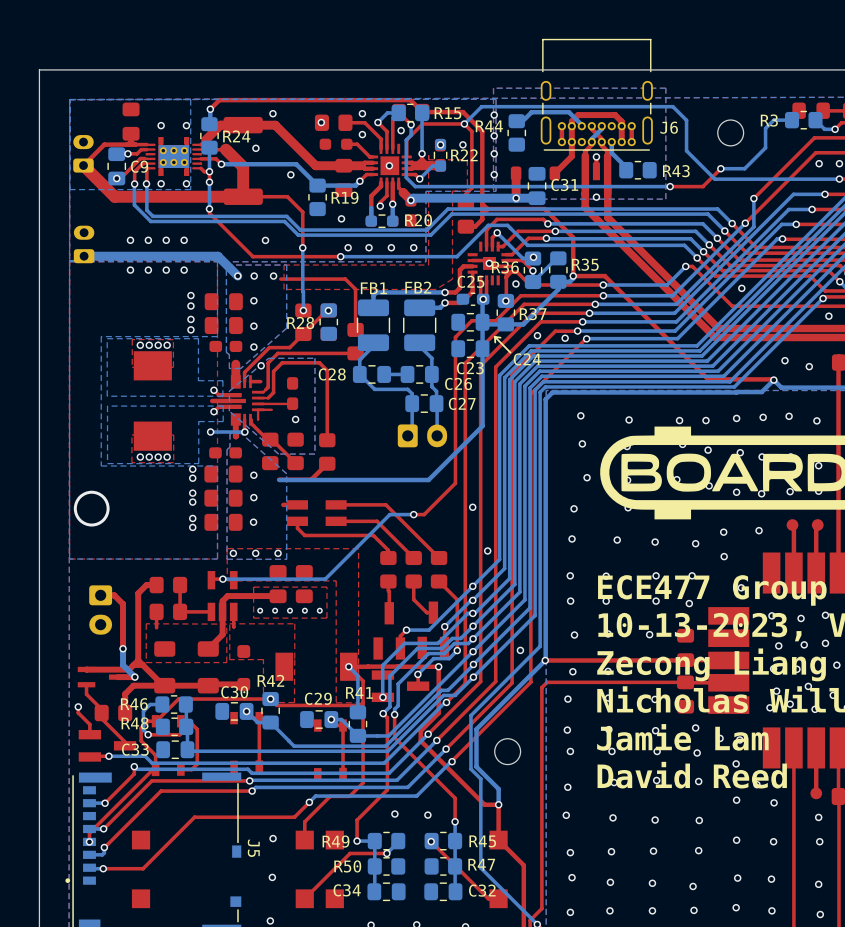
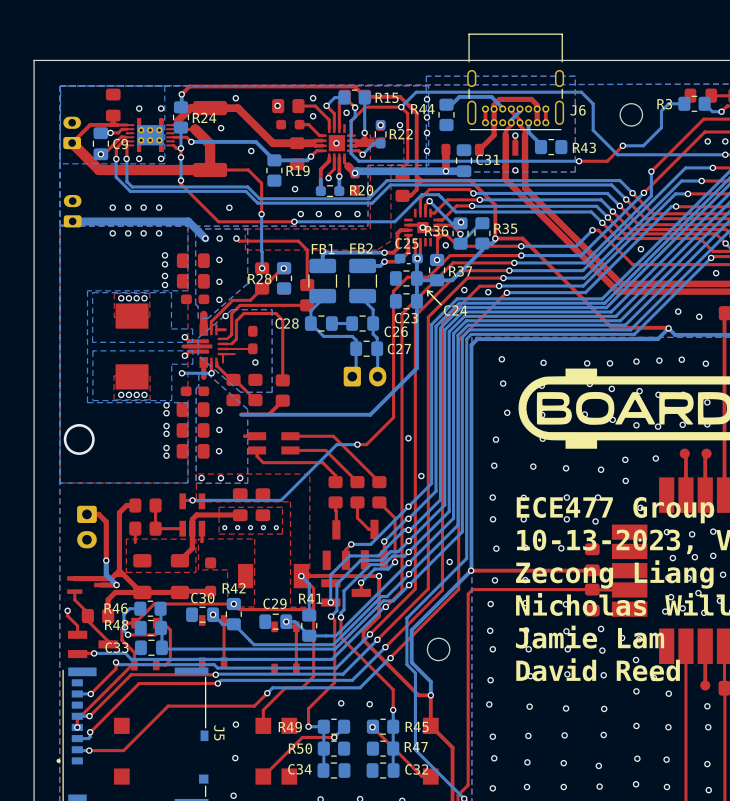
top track: none -> (236, 238) (242, 241)

